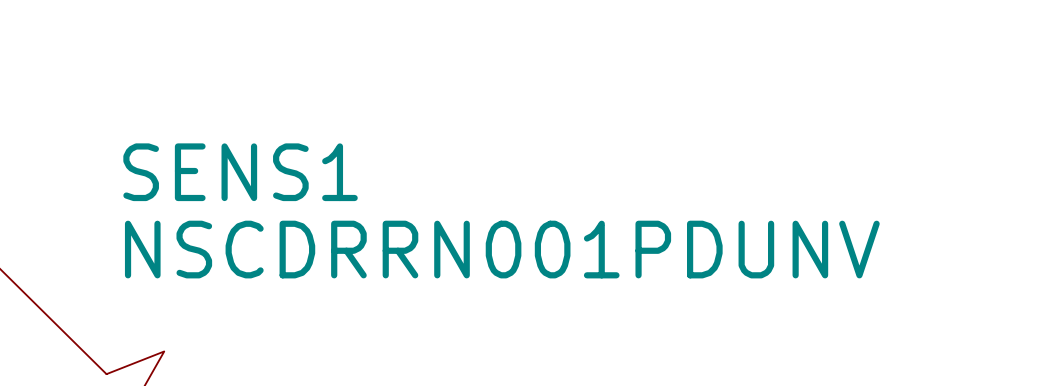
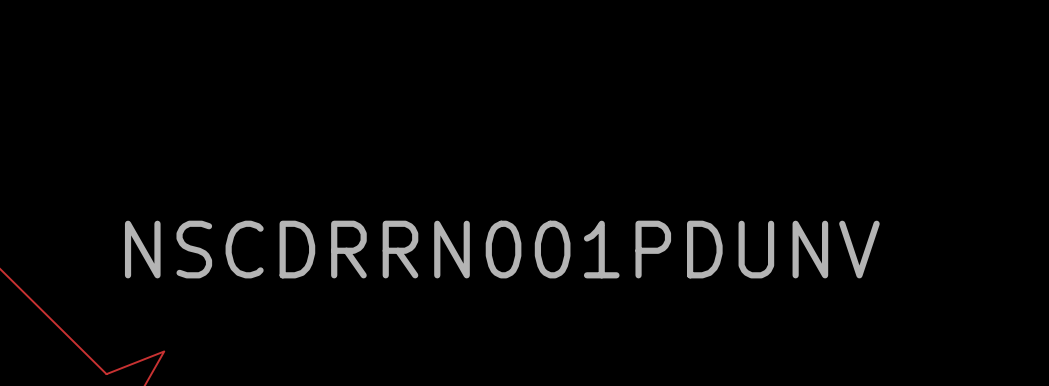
SENS1 name: SENS1 (240, 172) -> none

